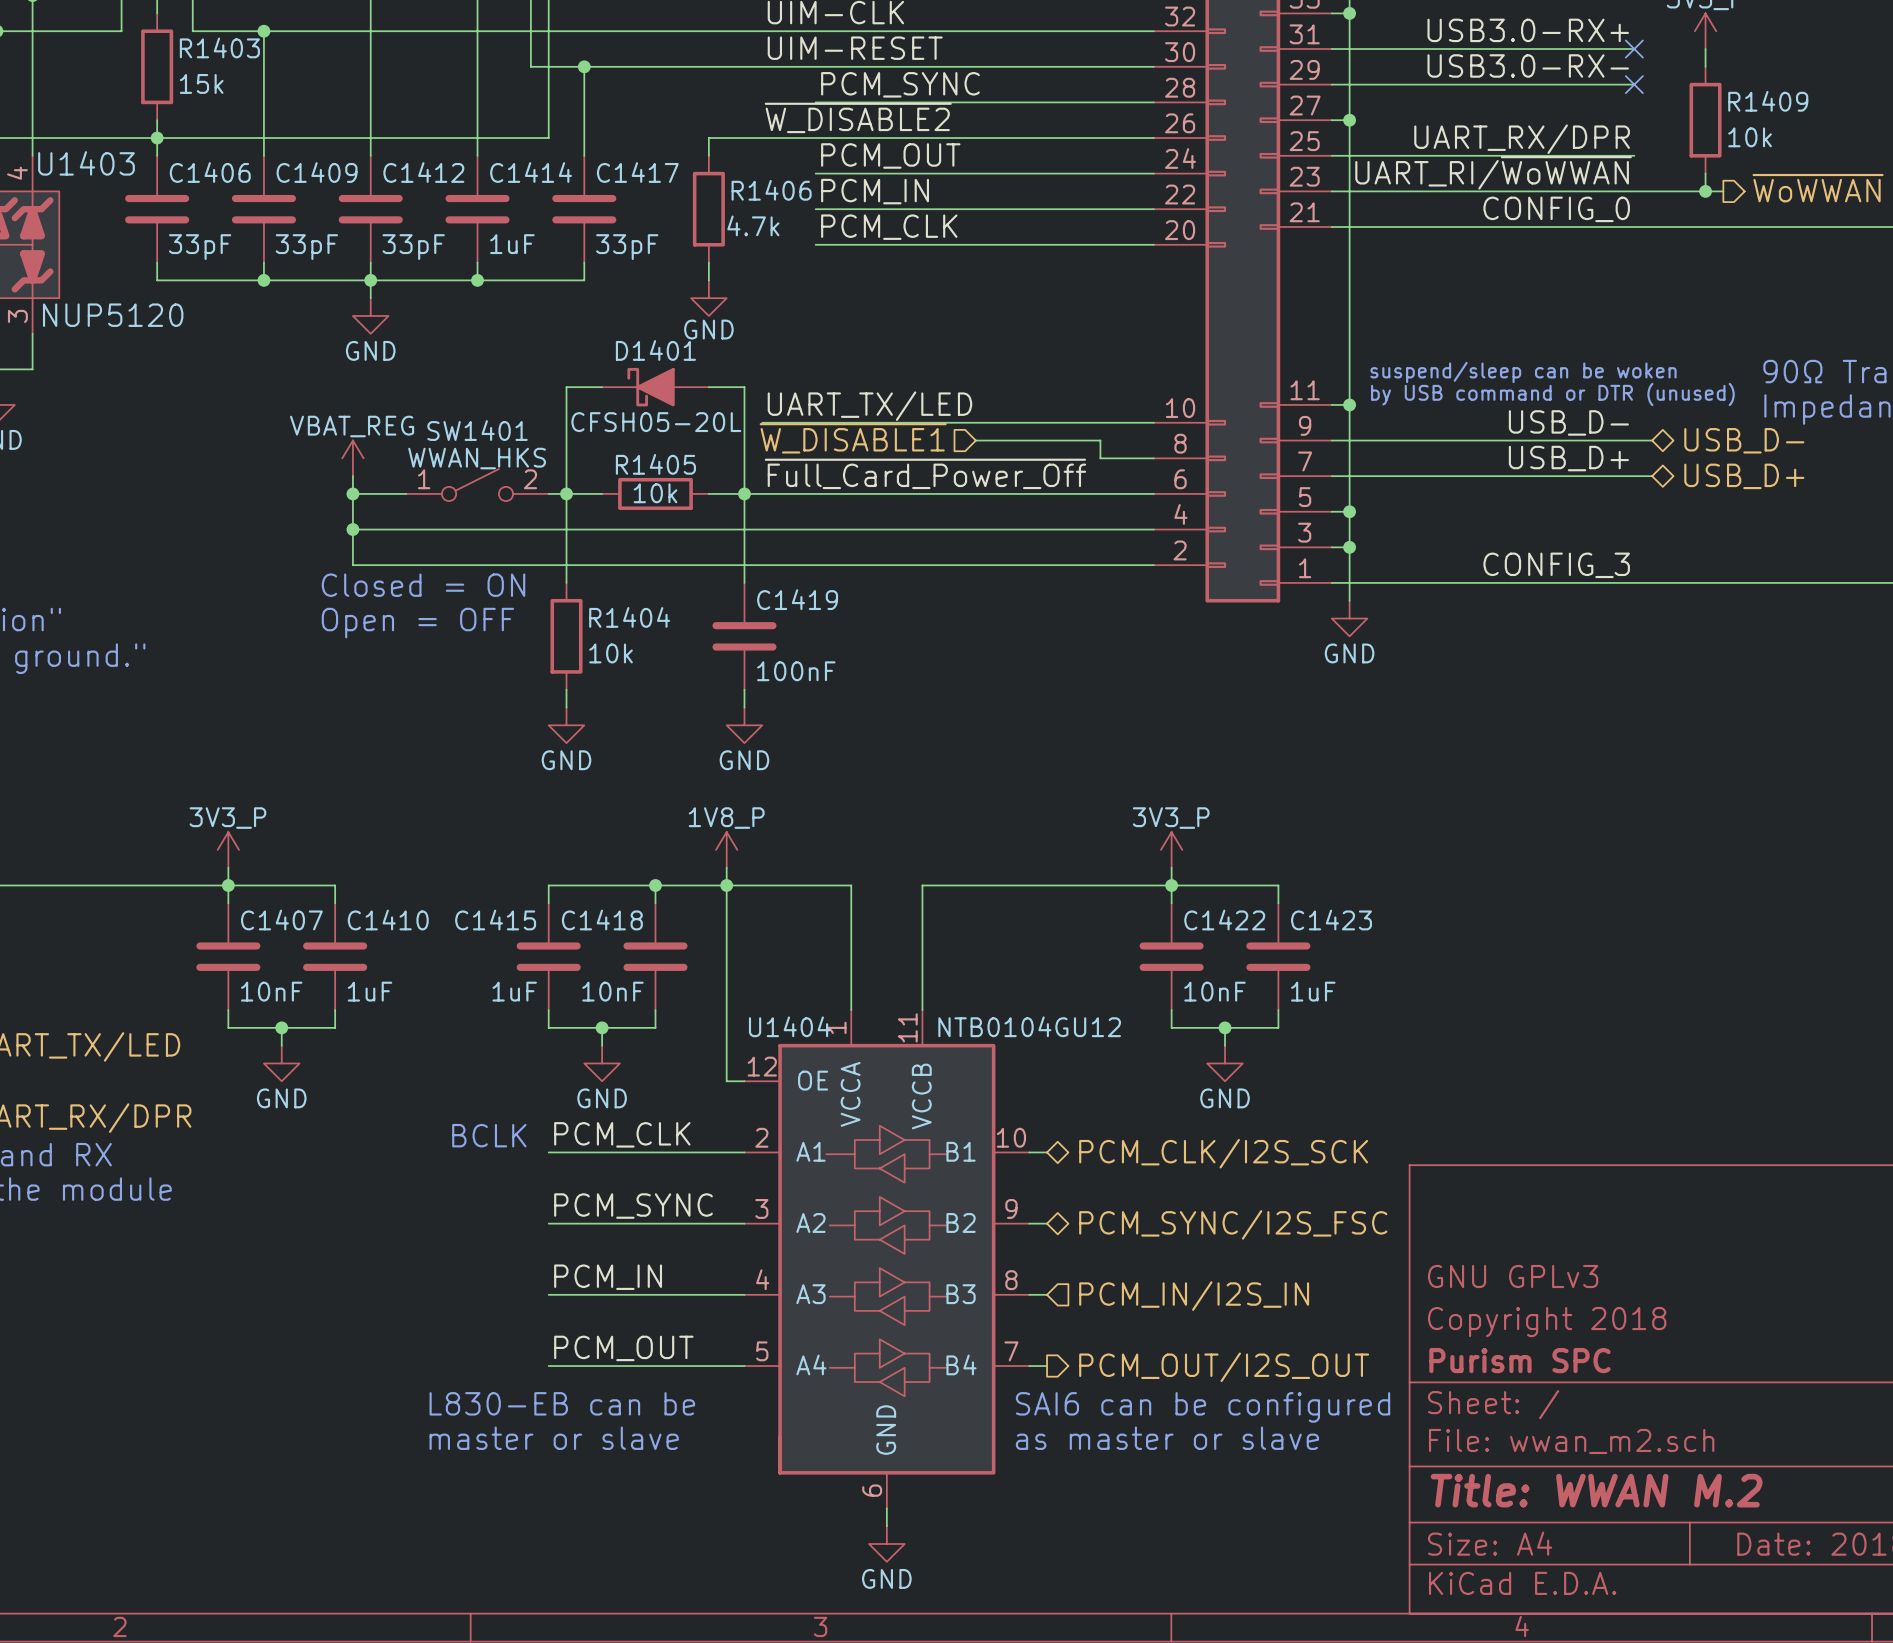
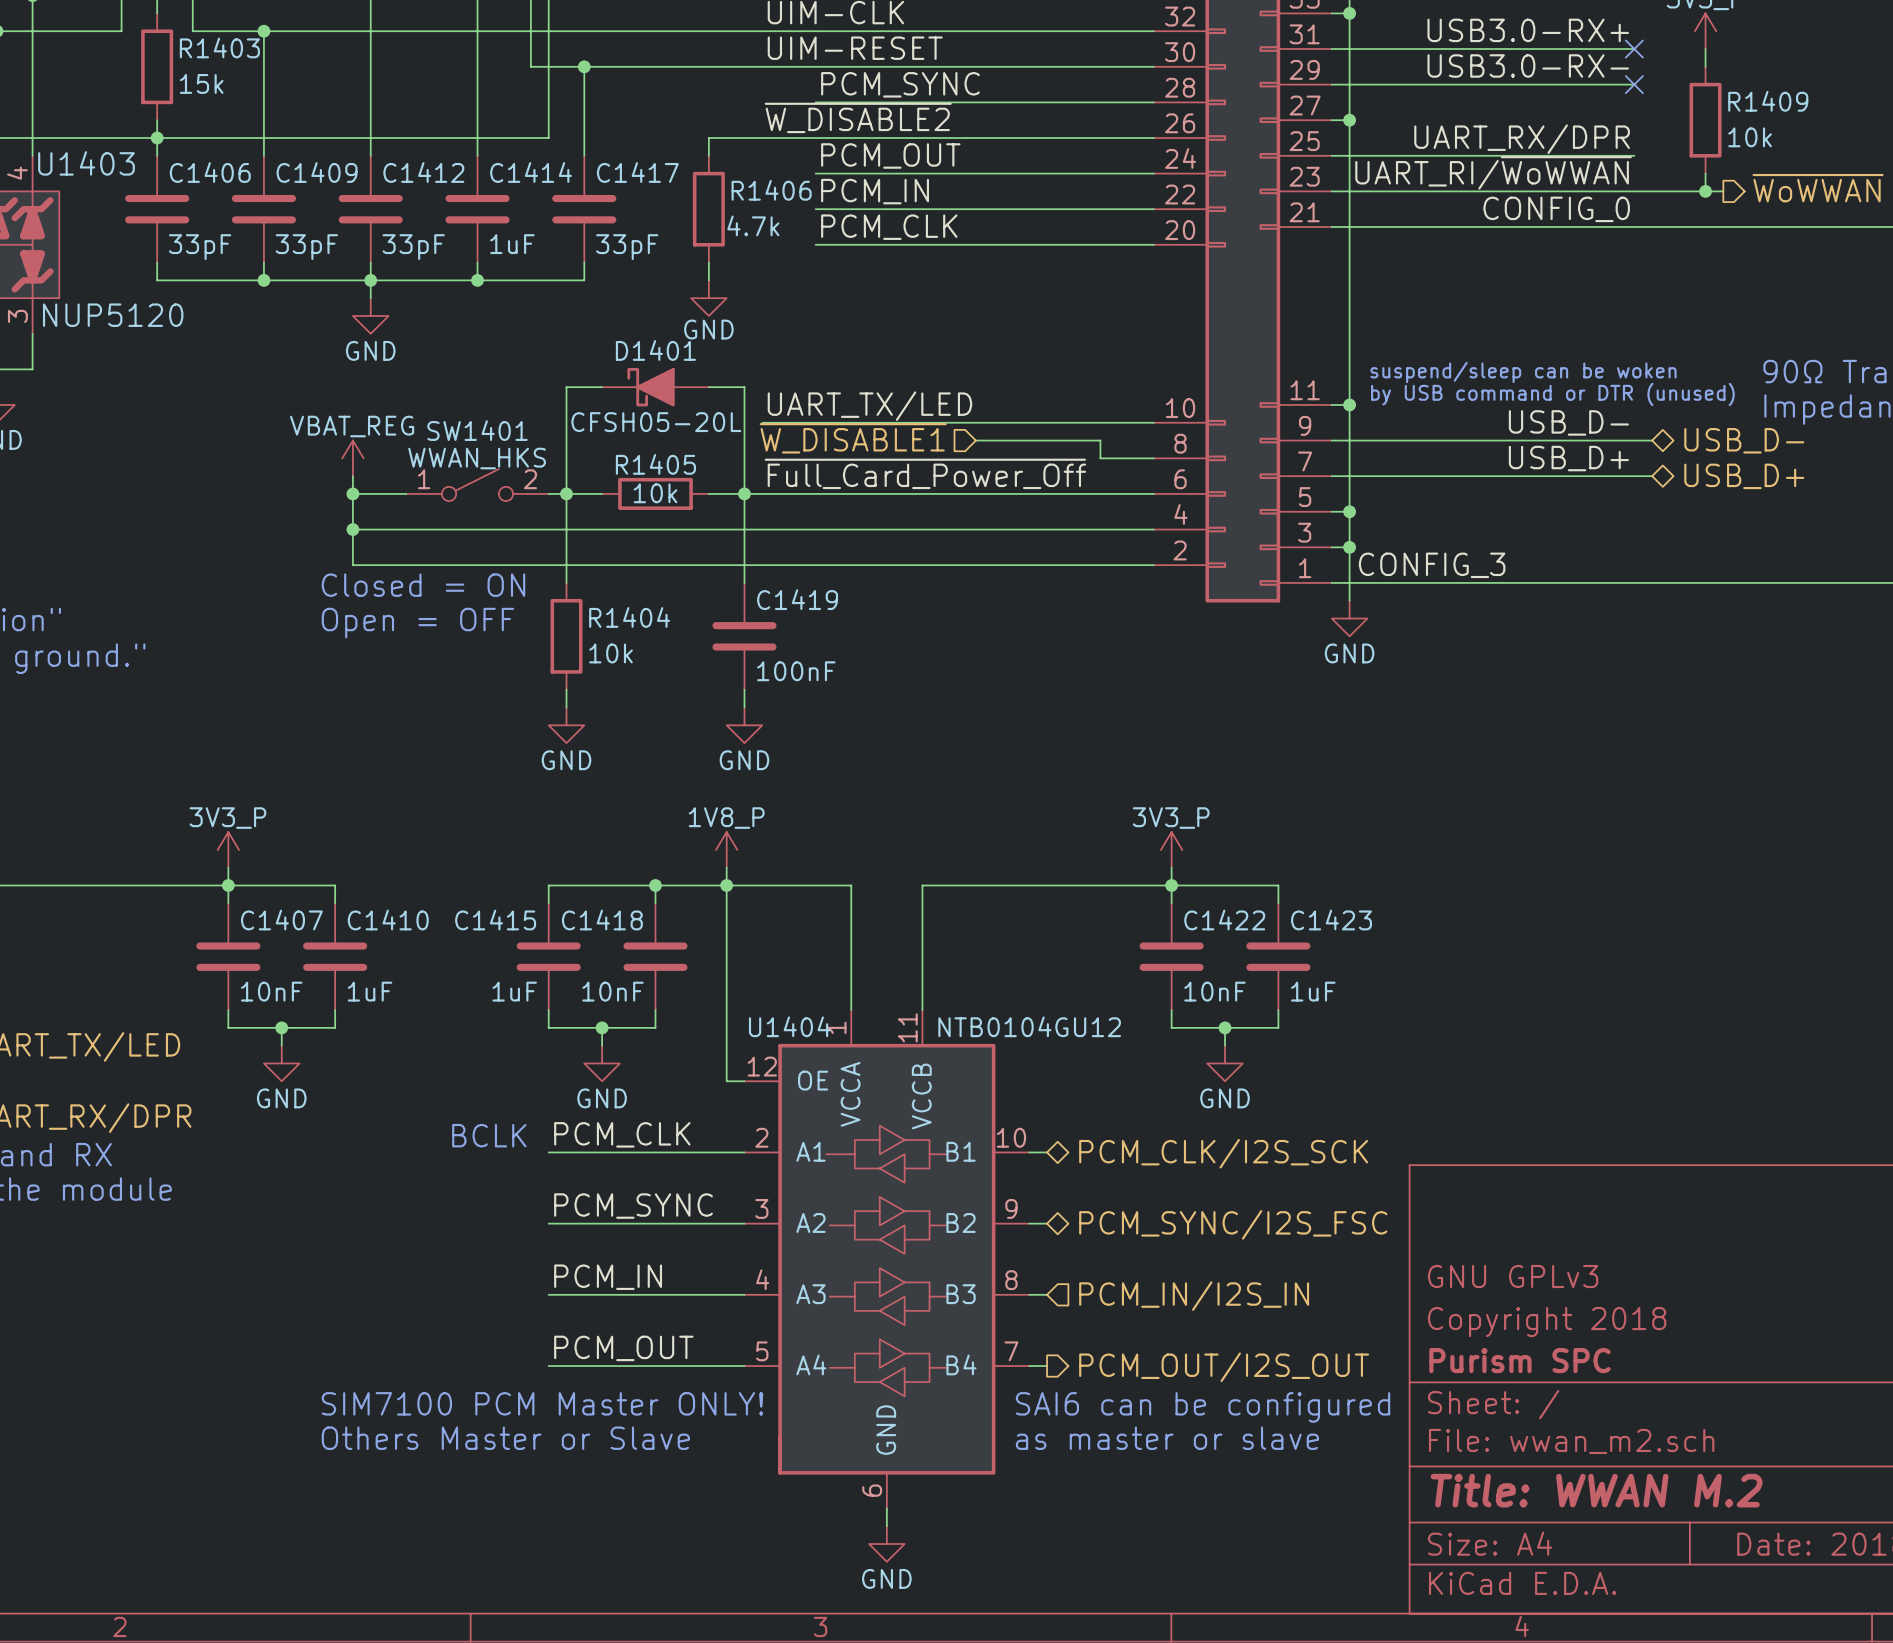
label position: CONFIG_3 (1556, 565) -> CONFIG_3 (1432, 565)
text: none -> SIM7100 PCM Master ONLY! (542, 1403)
text: L830-EB can be (562, 1403) -> none
text: master or slave (554, 1438) -> Others Master or Slave (505, 1438)

